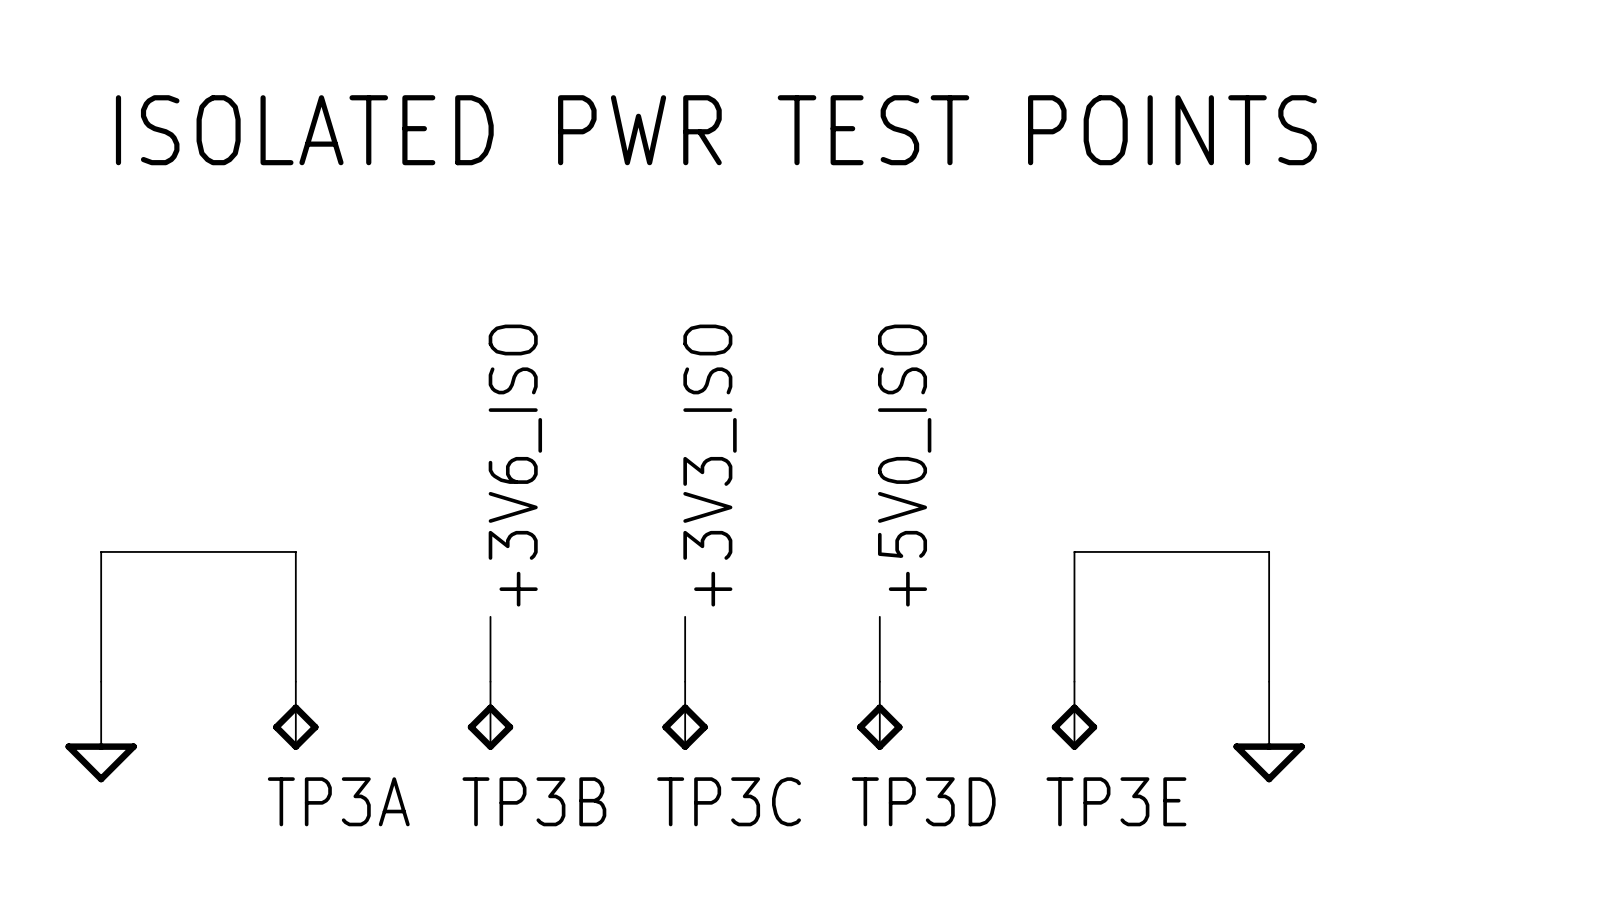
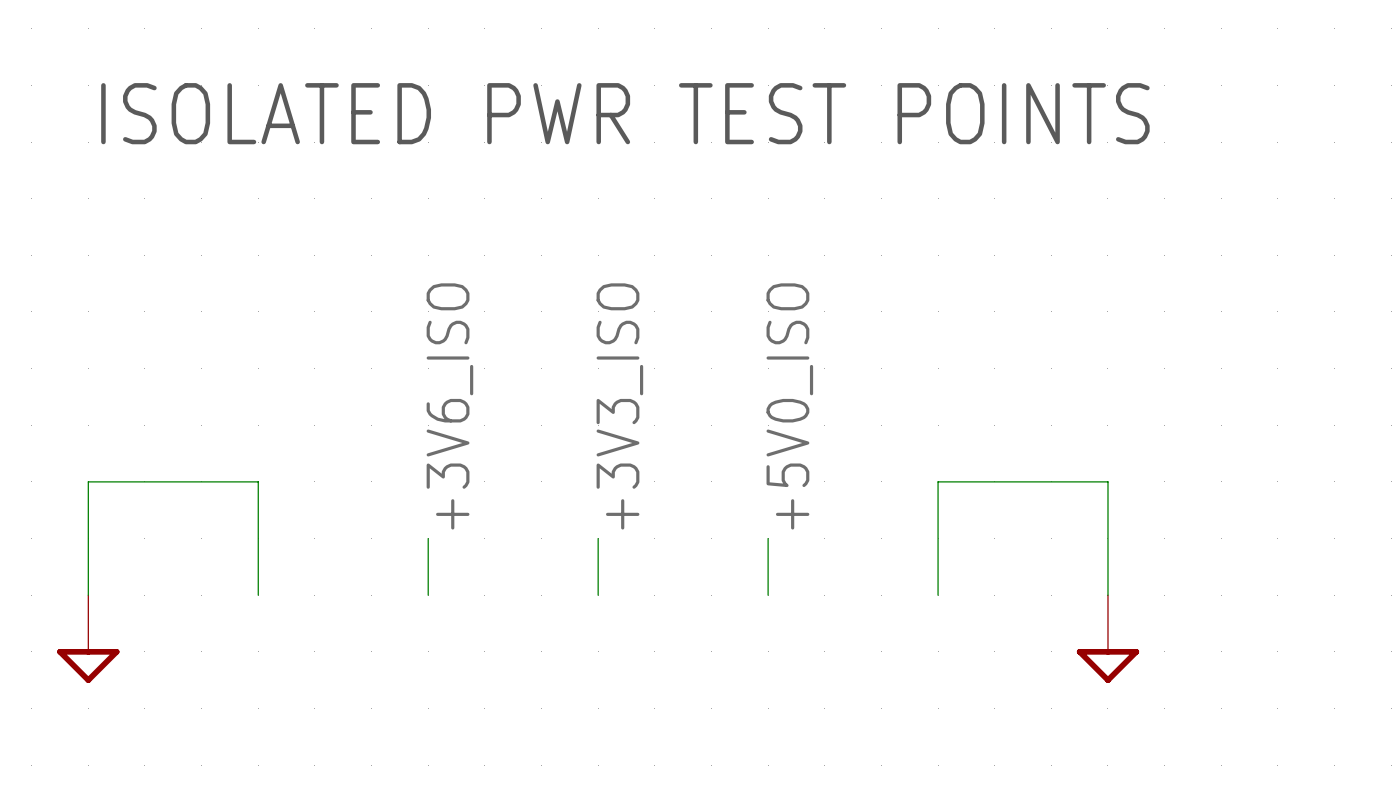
TP3A: (295, 715) -> none
TP3B: (490, 715) -> none
TP3C: (685, 715) -> none
TP3D: (879, 715) -> none
TP3E: (1074, 715) -> none

